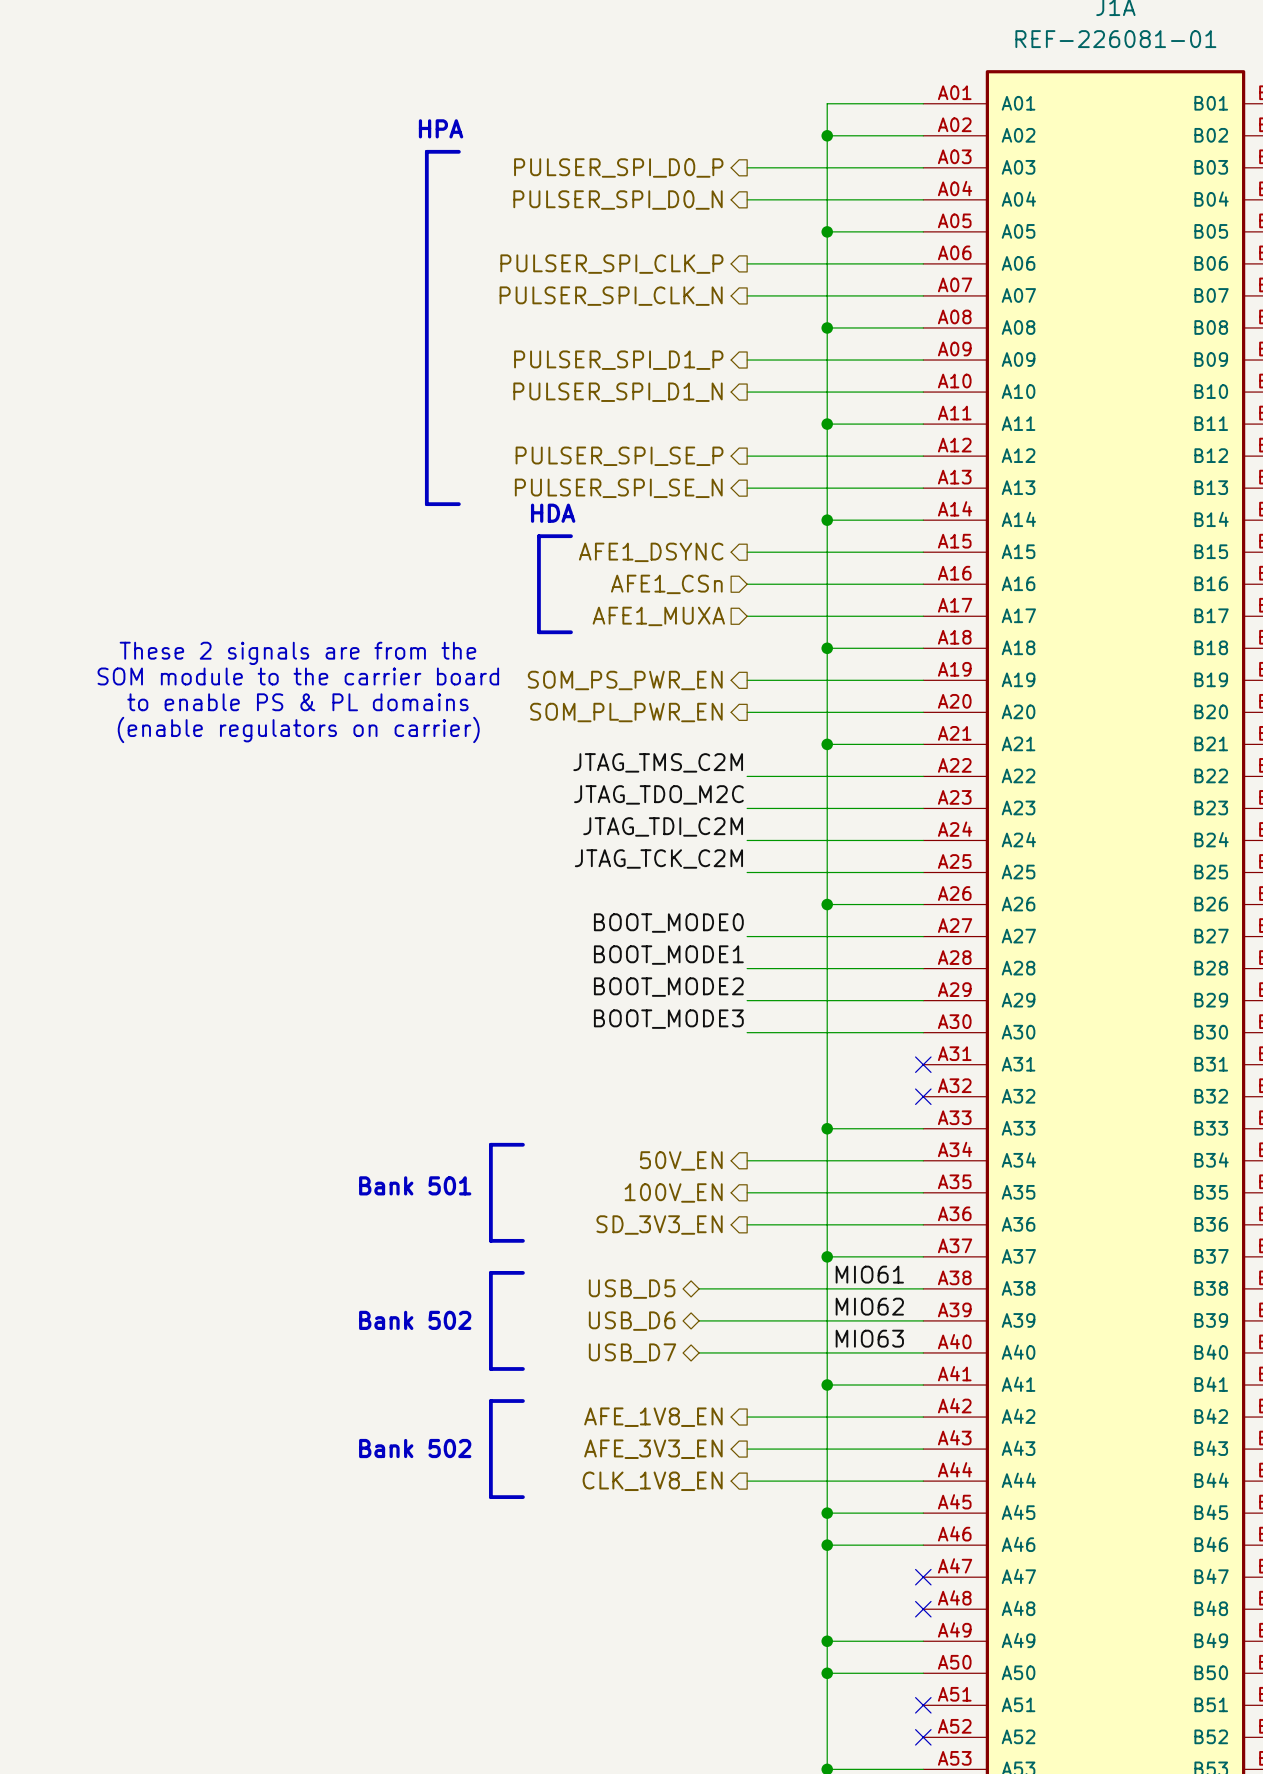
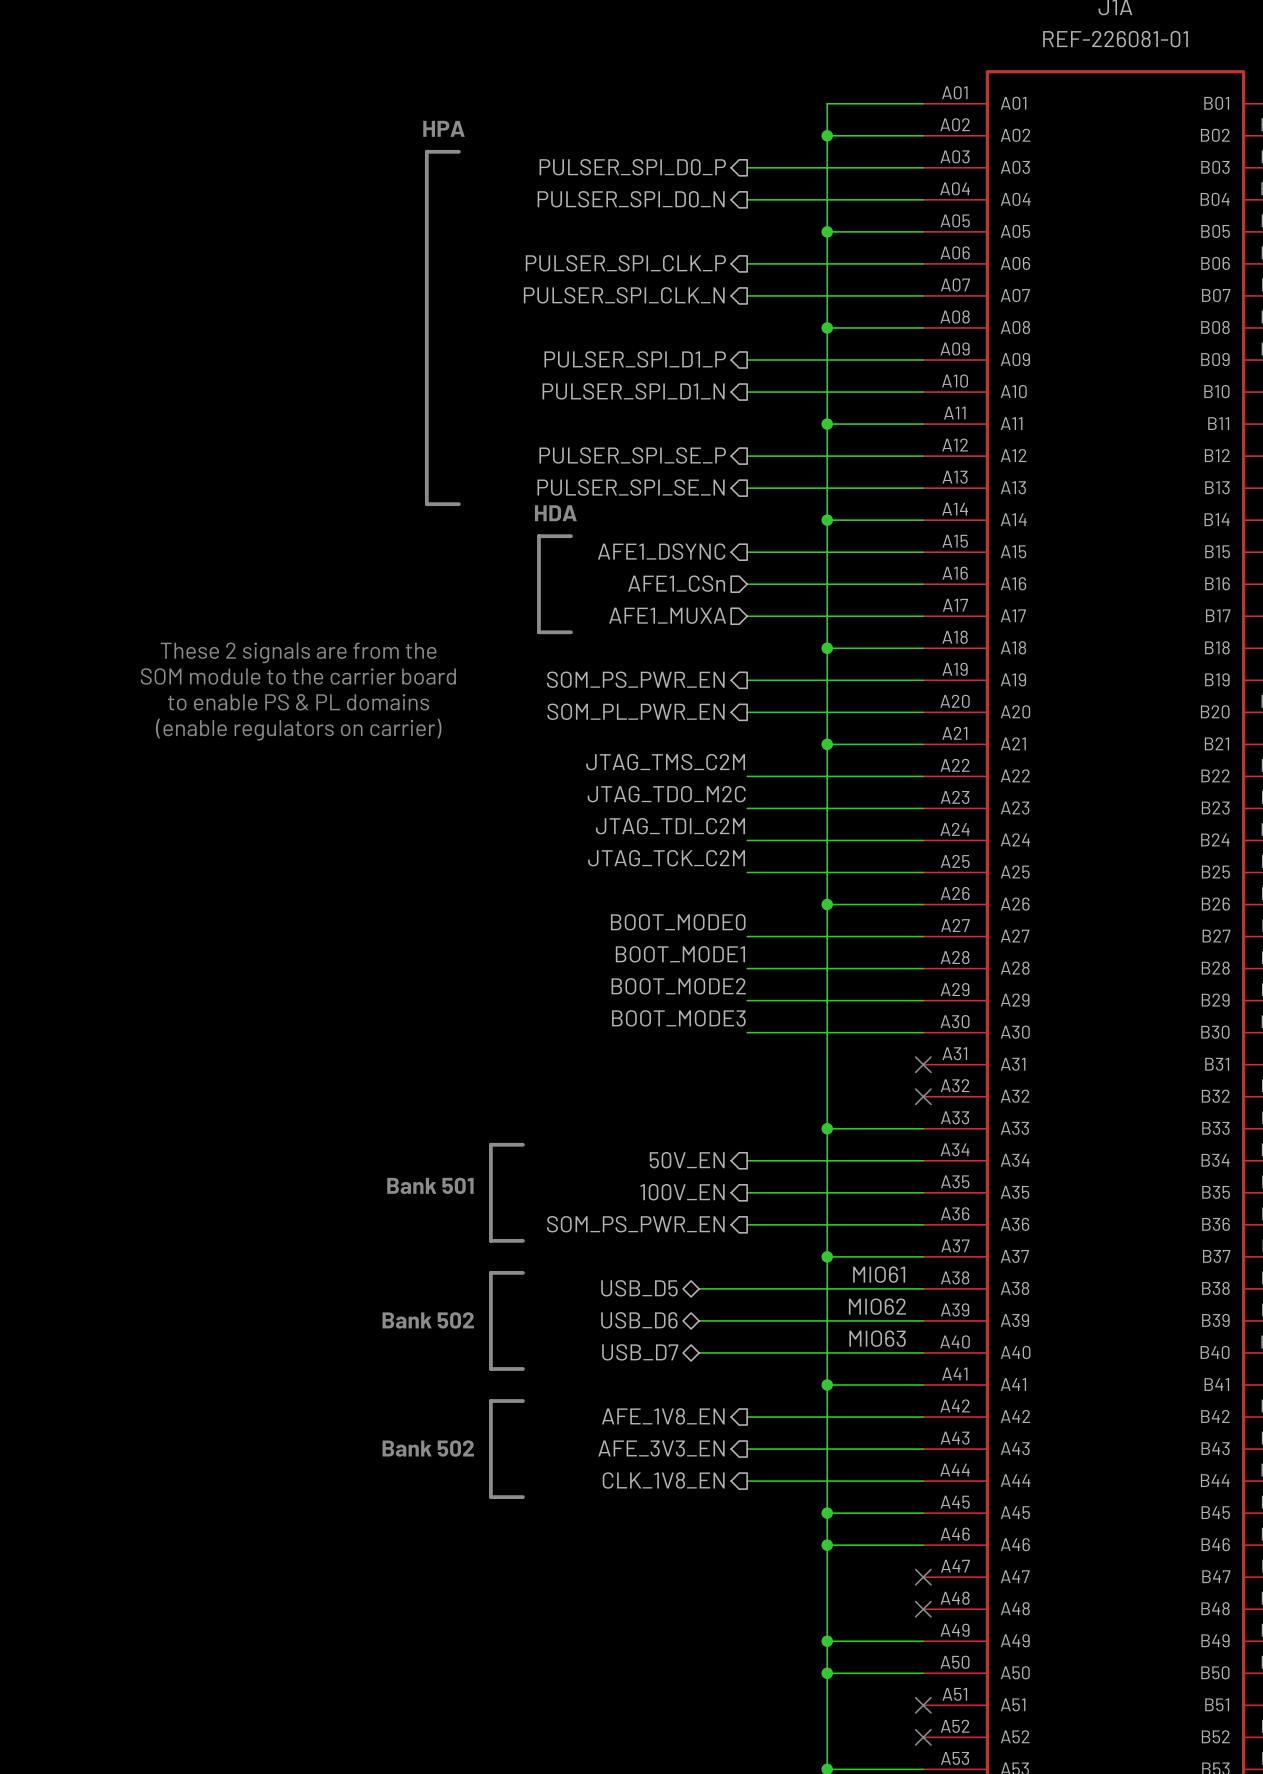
hierarchical label: SD_3V3_EN (659, 1225) -> SOM_PS_PWR_EN (635, 1224)

